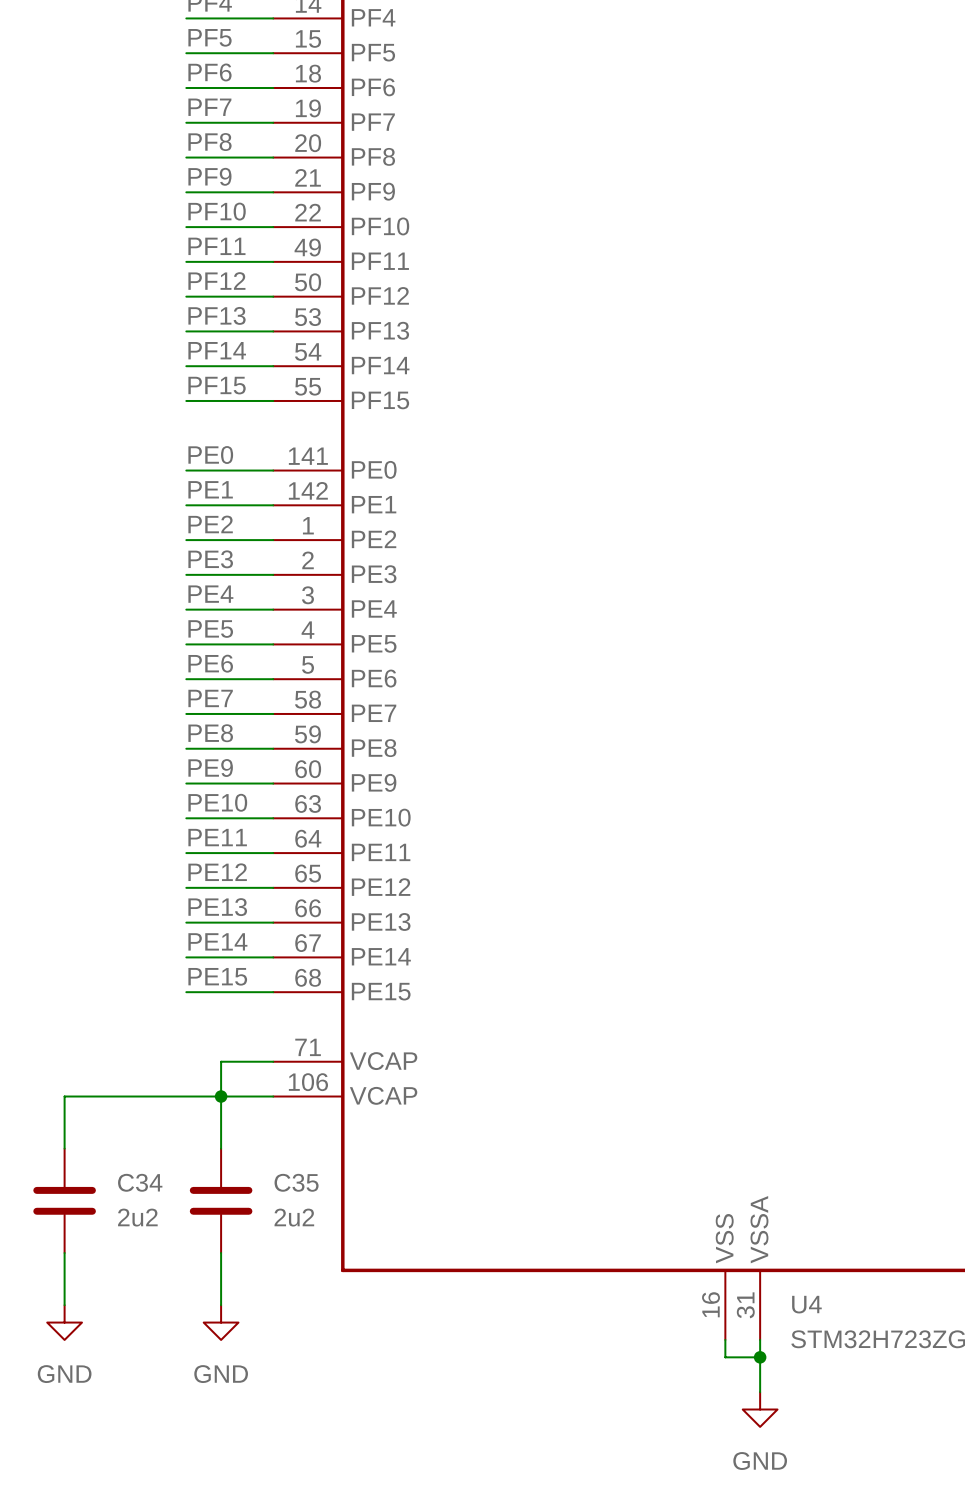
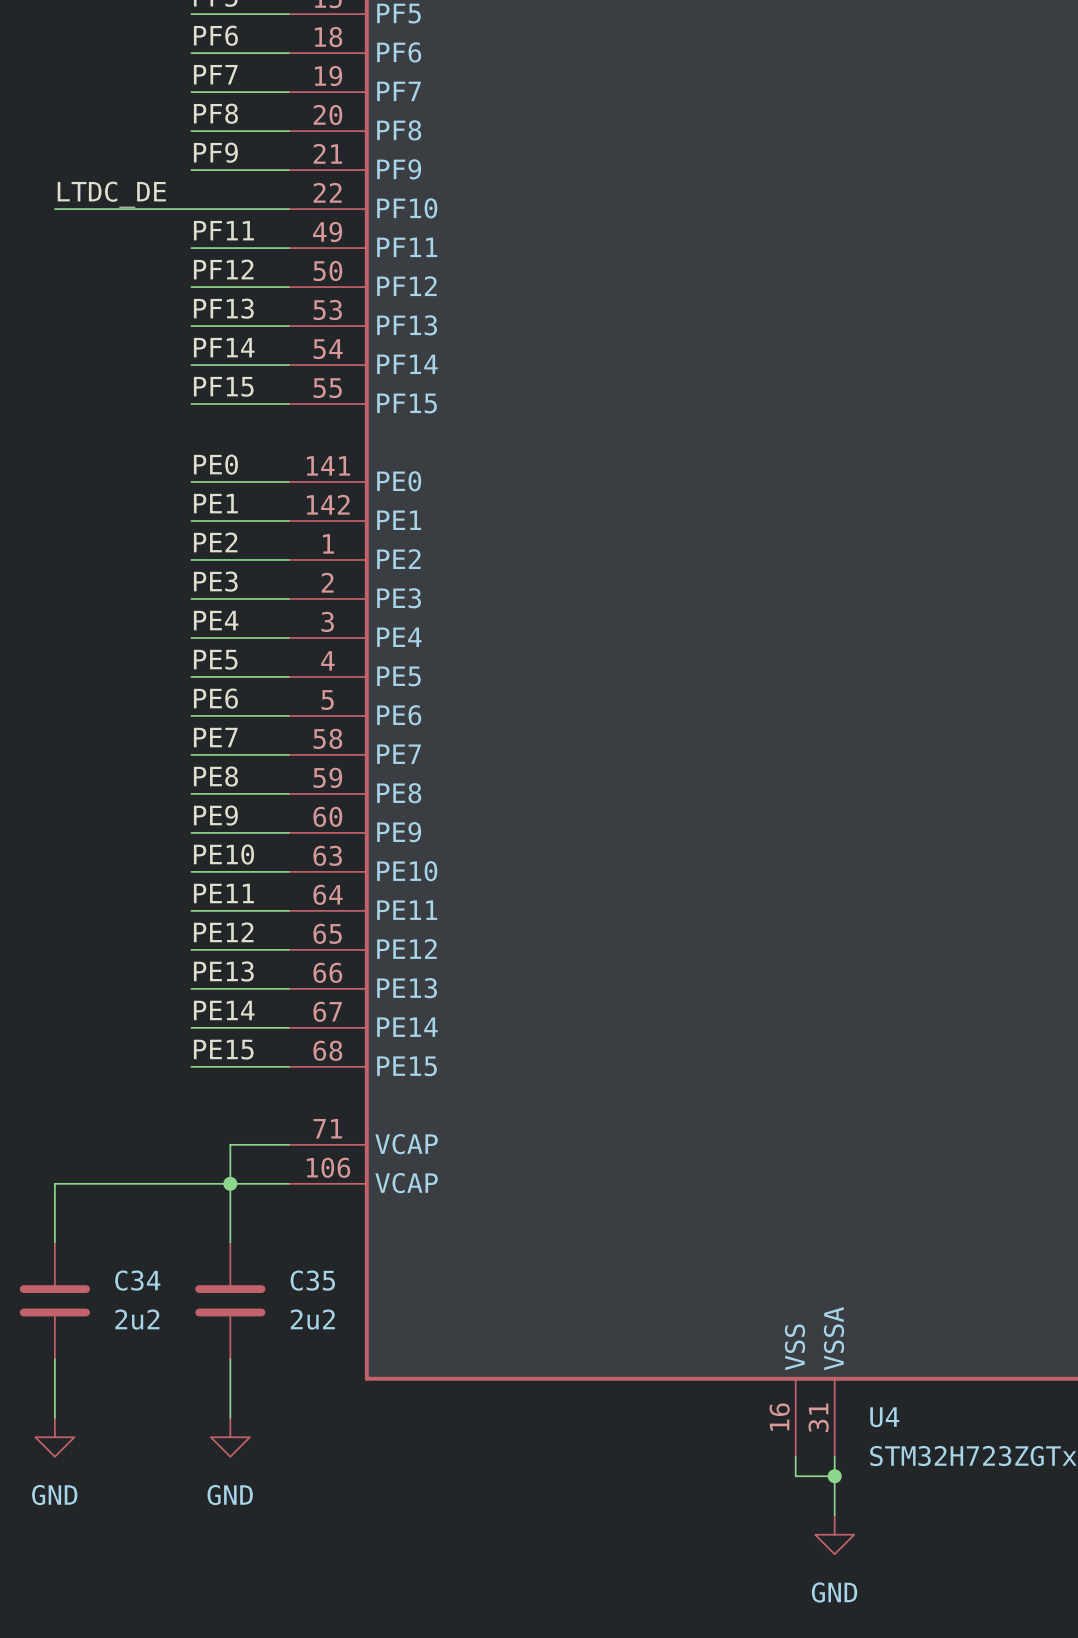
label: PF10 (217, 211) -> none
label: none -> LTDC_DE (111, 194)
wire: none -> (54, 209) (191, 209)

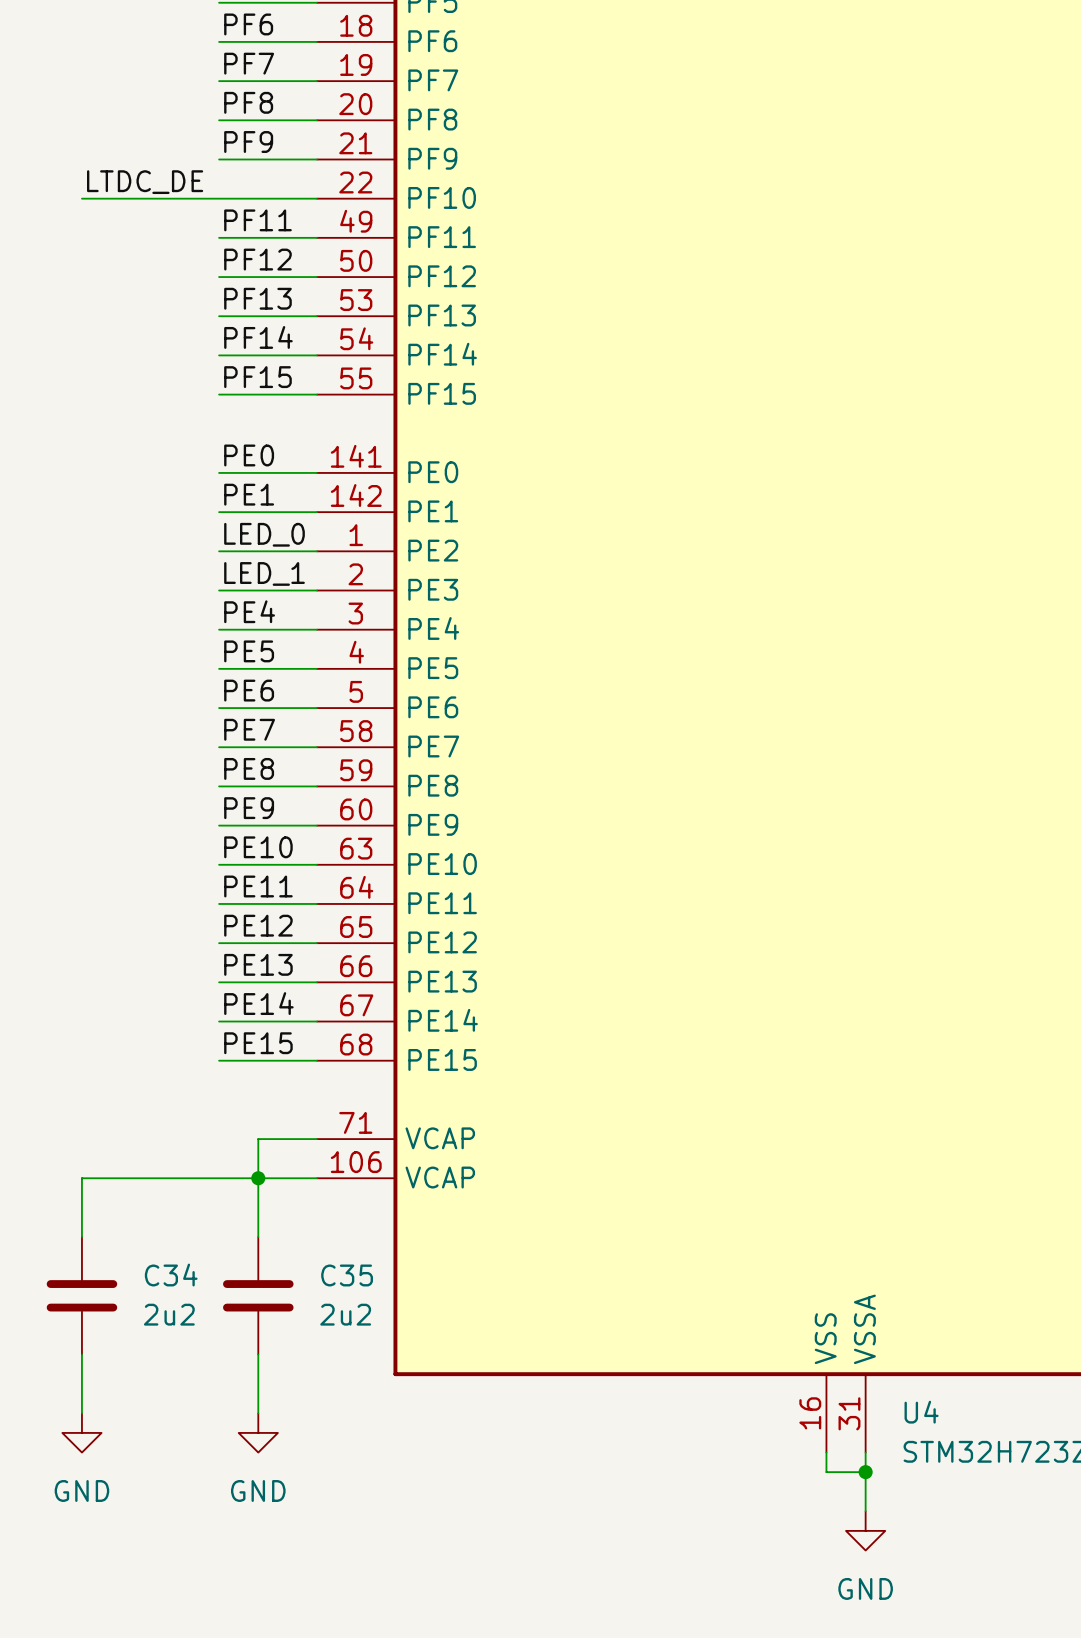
label: PE2 (215, 542) -> LED_0 (264, 534)
label: PE3 (215, 581) -> LED_1 (264, 573)

